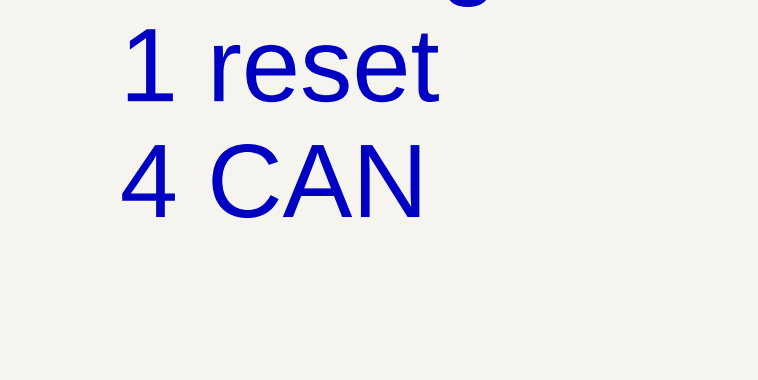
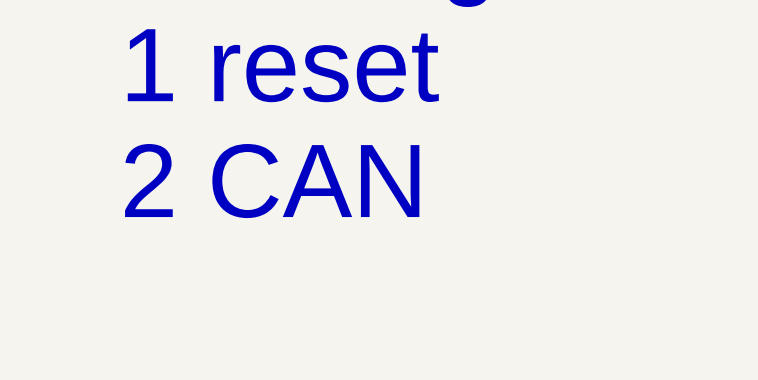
text: 4 CAN (270, 181) -> 2 CAN (272, 181)

